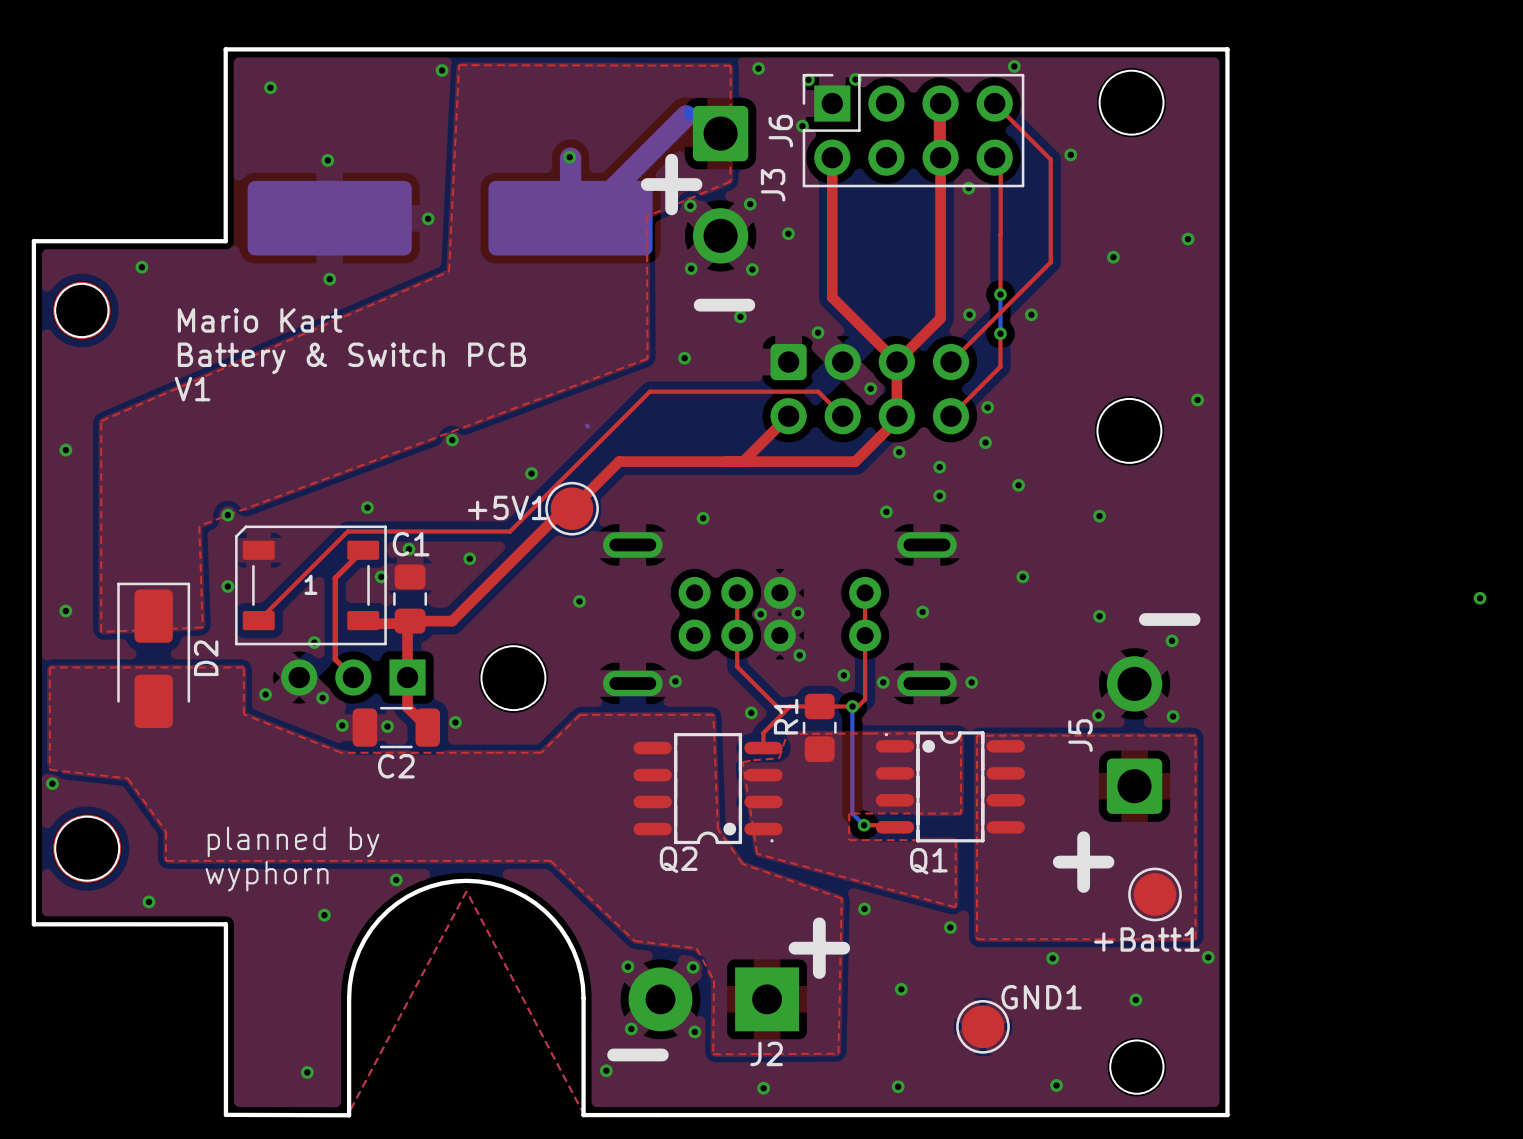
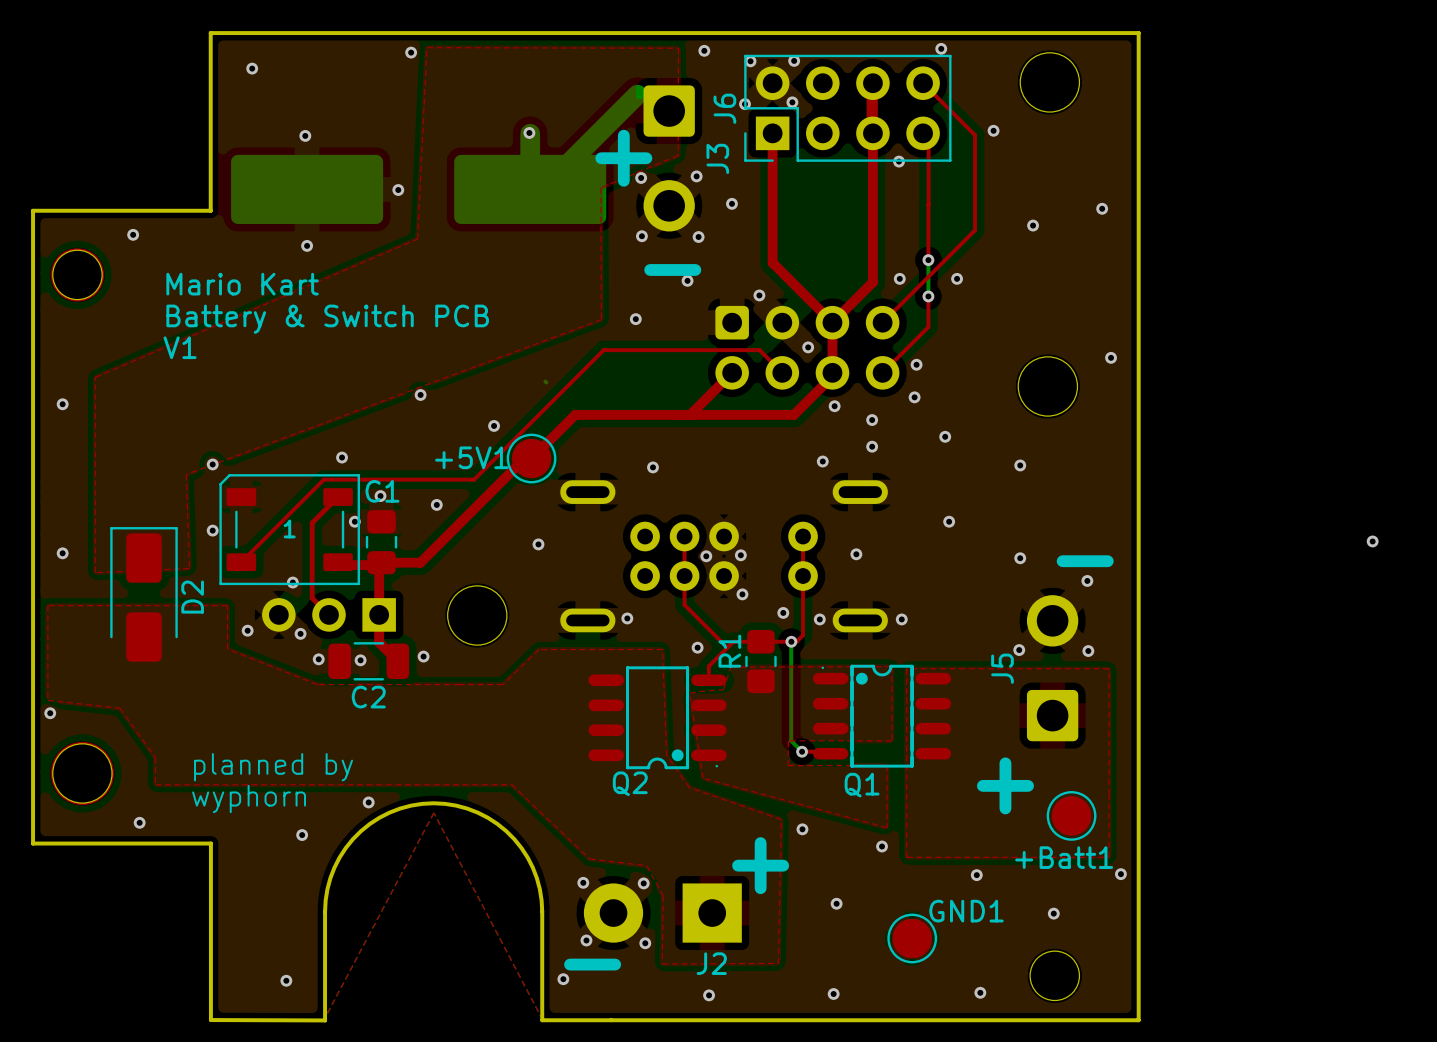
J6 footprint: [802, 73, 1025, 188] -> [744, 54, 952, 162]
via: none -> (792, 102)

